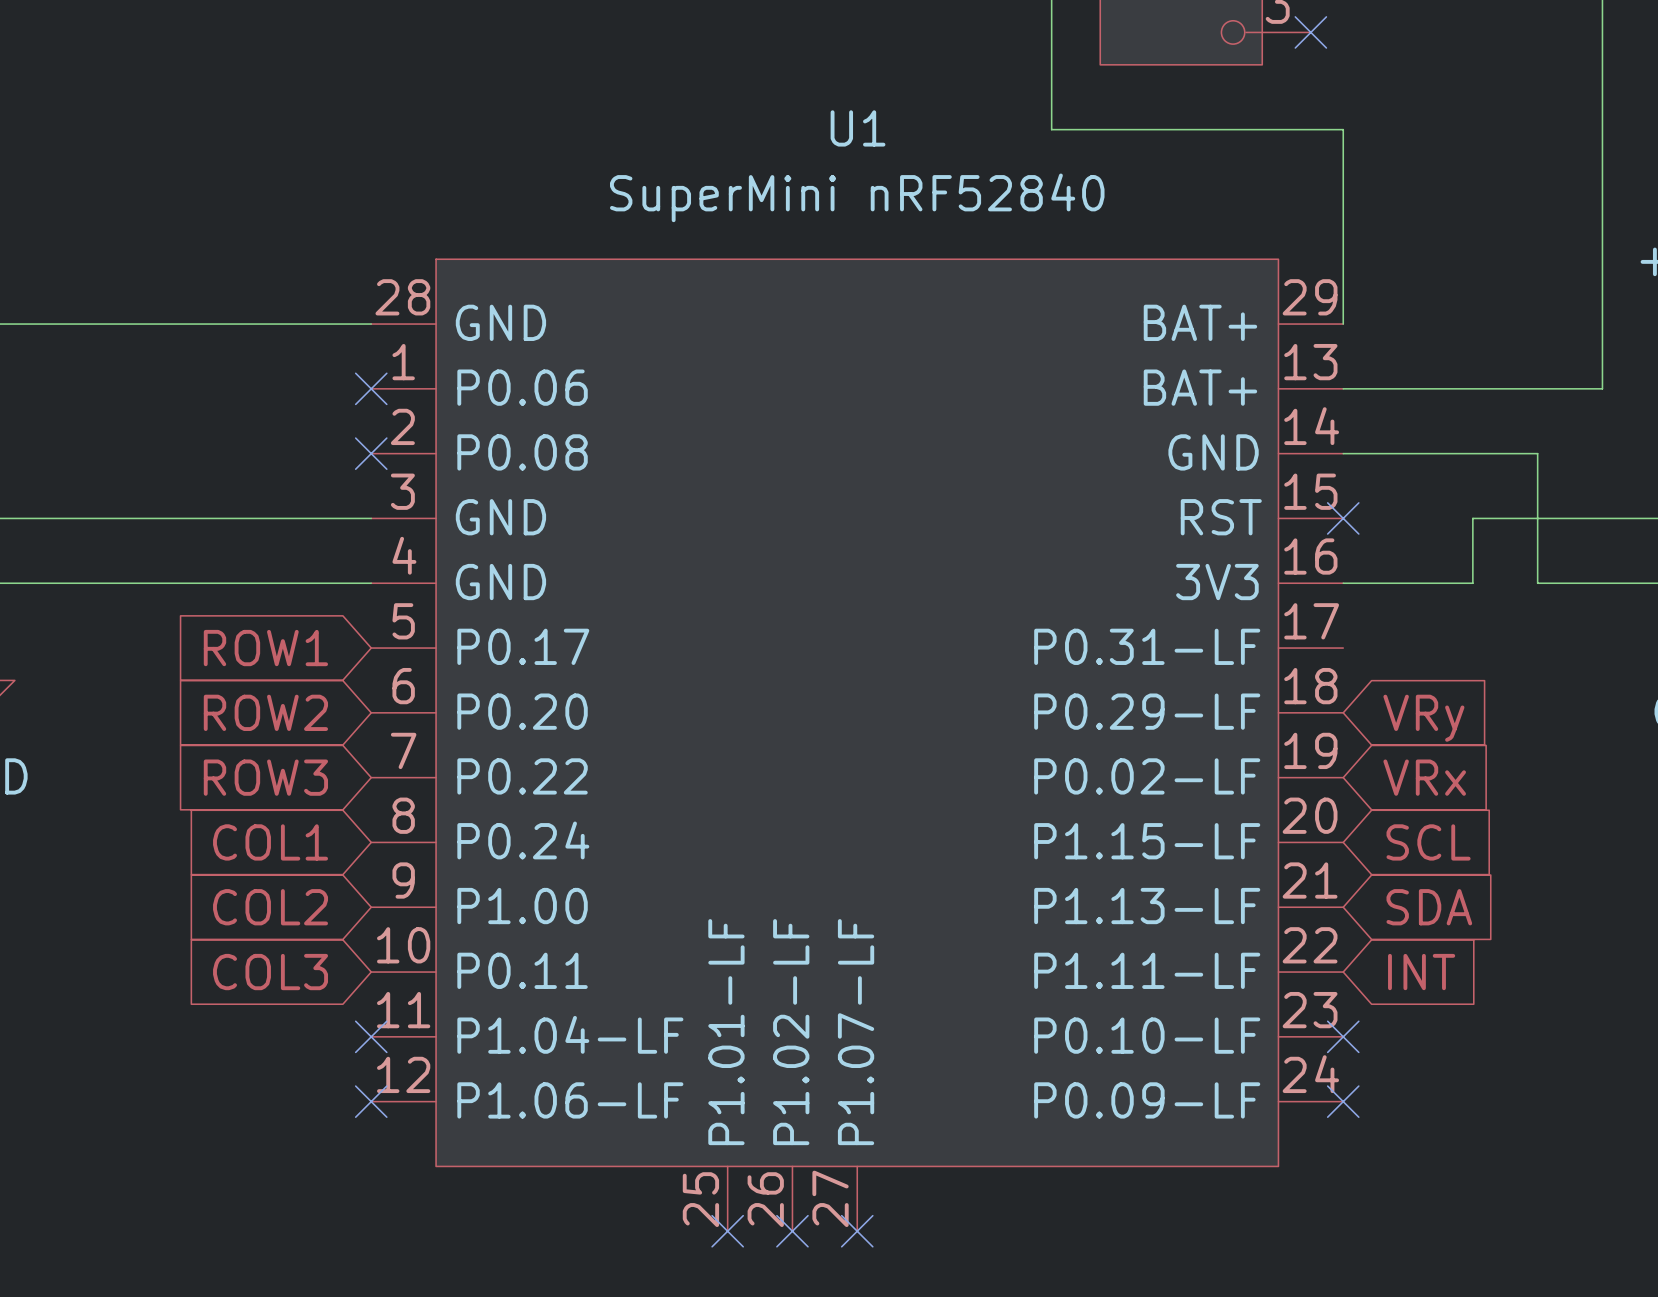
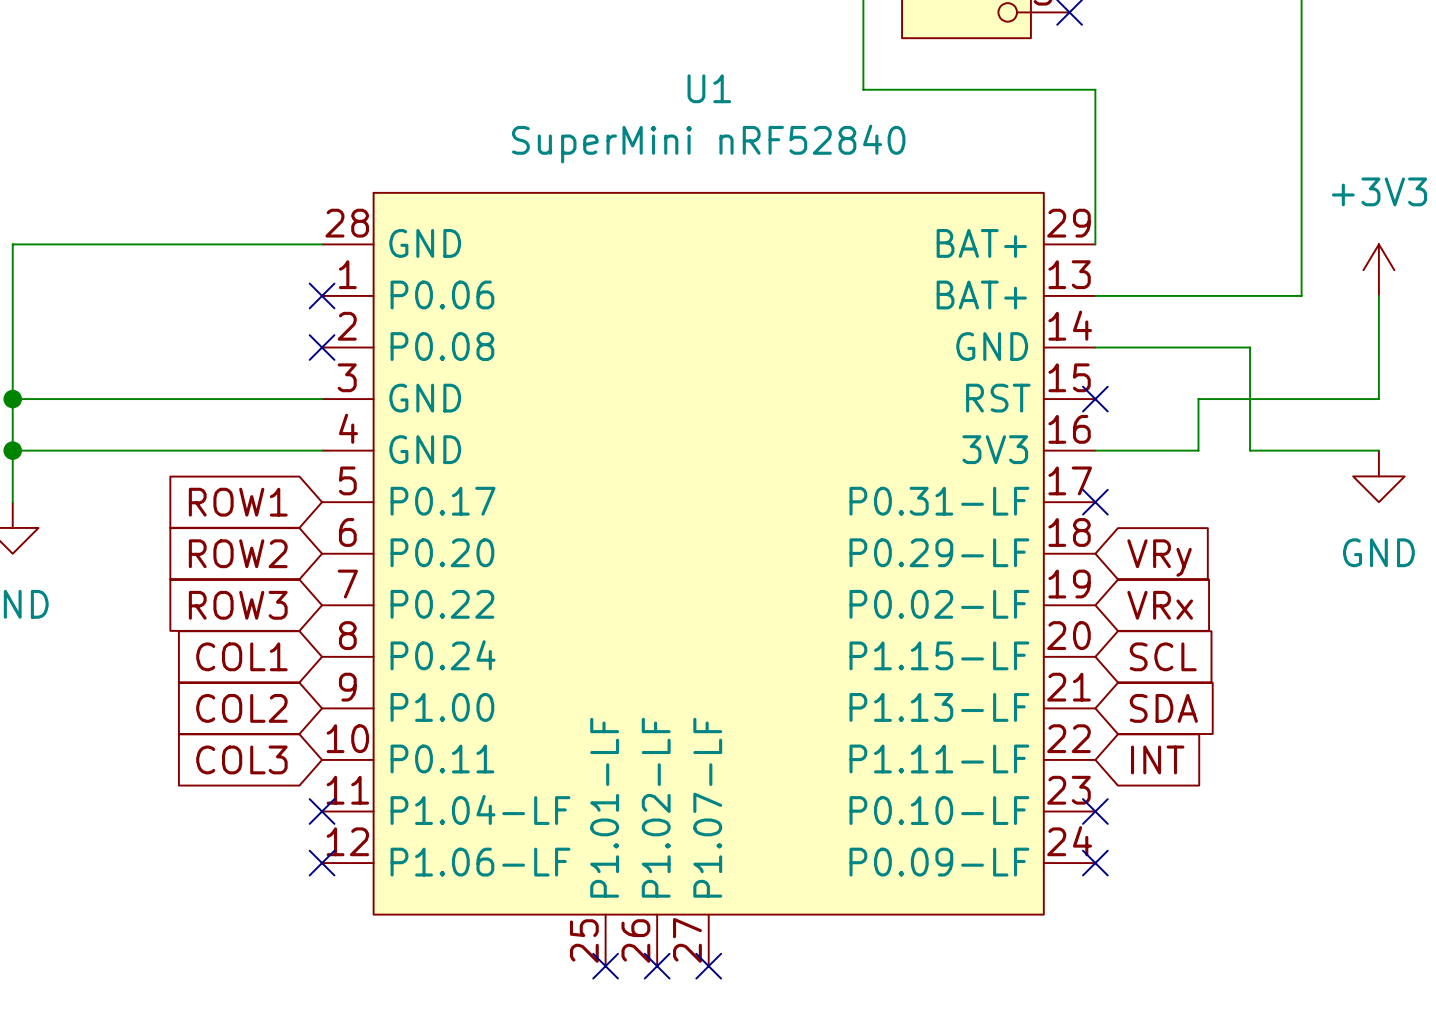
no-connect mark: none -> (1095, 502)

